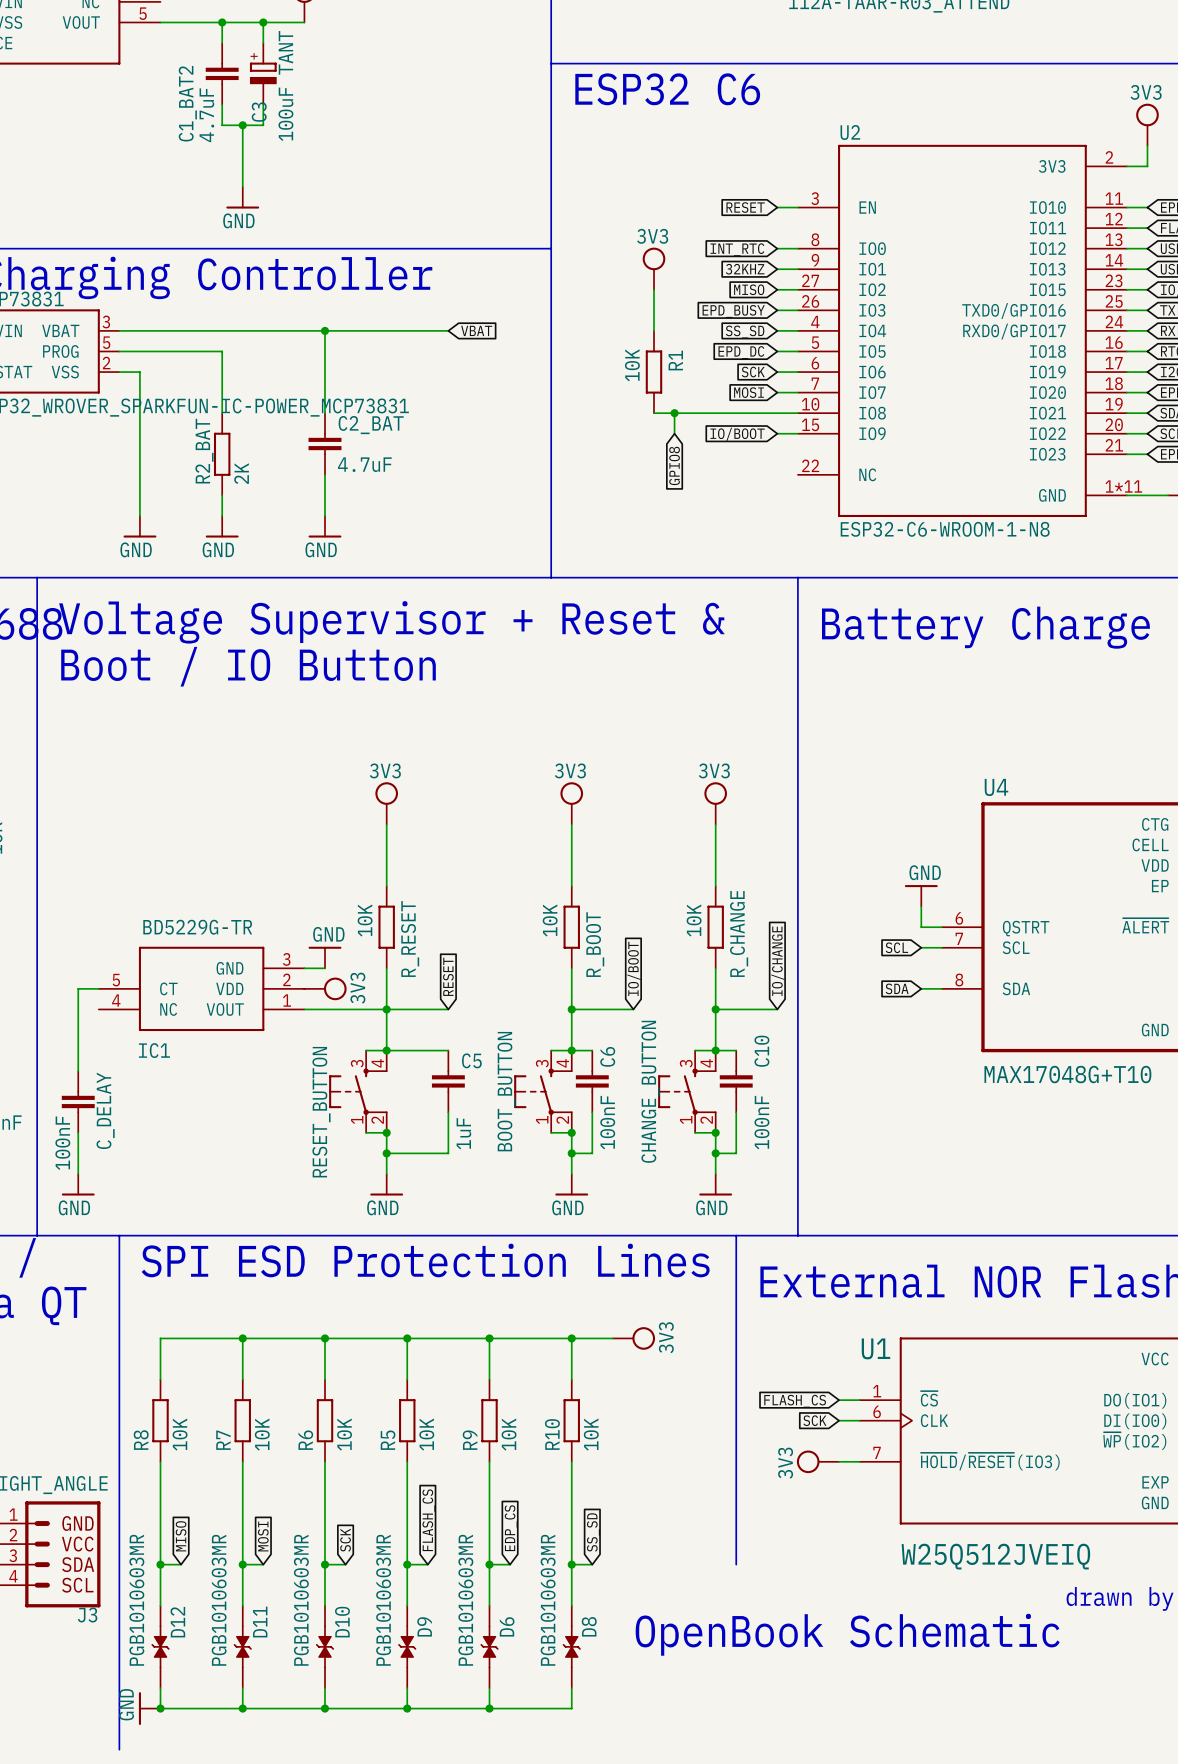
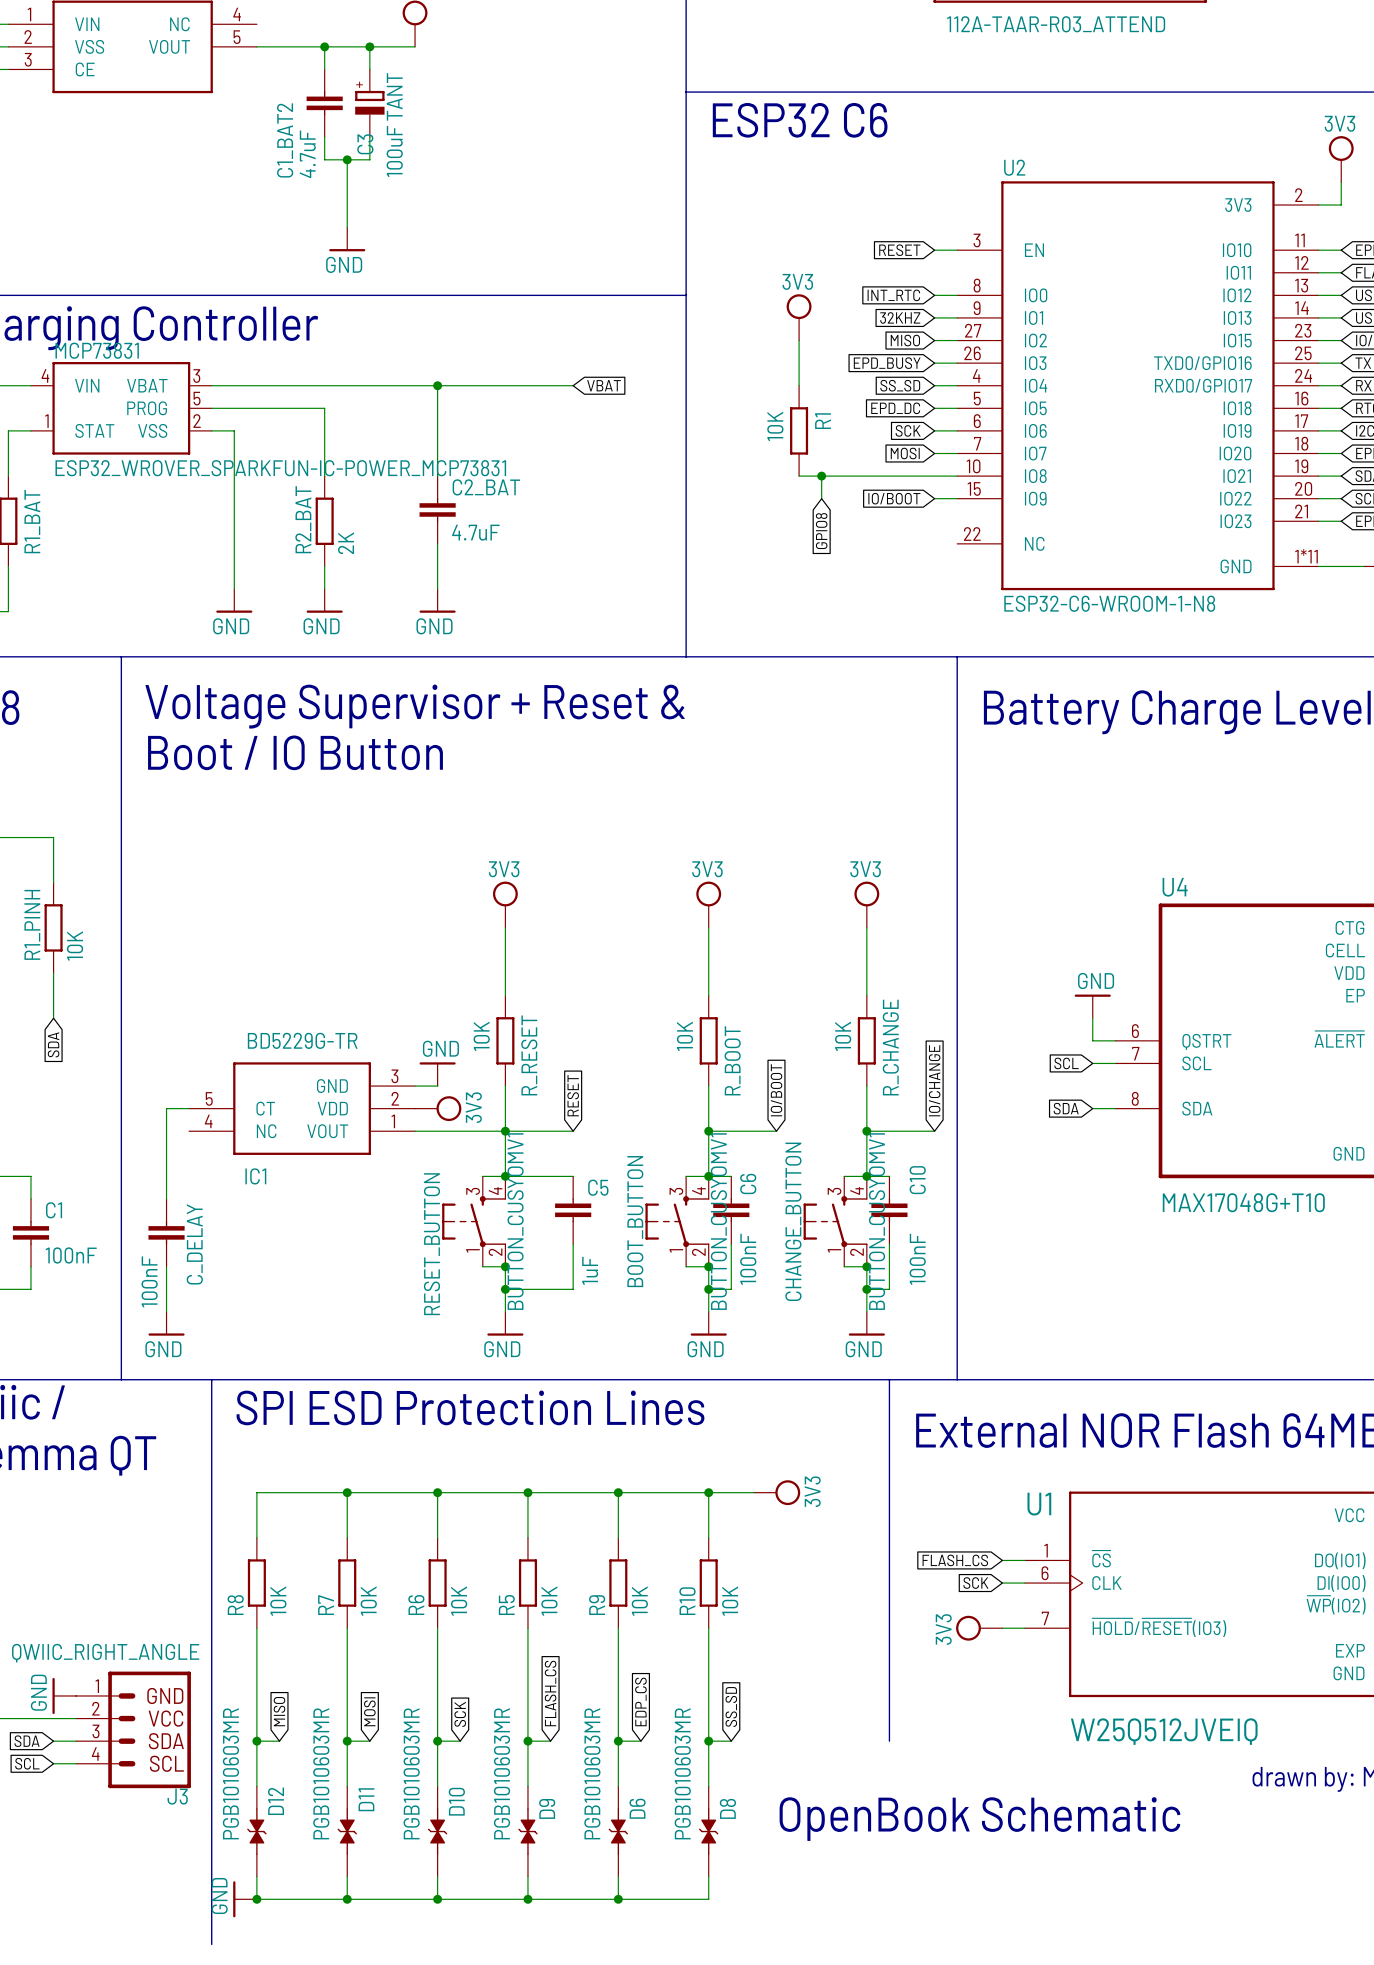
RESET_BUTTON value: none -> BUTTON_CUSYOMV1 (515, 1221)
BOOT_BUTTON value: none -> BUTTON_CUSYOMV1 (718, 1221)
CHANGE_BUTTON value: none -> BUTTON_CUSYOMV1 (877, 1221)

